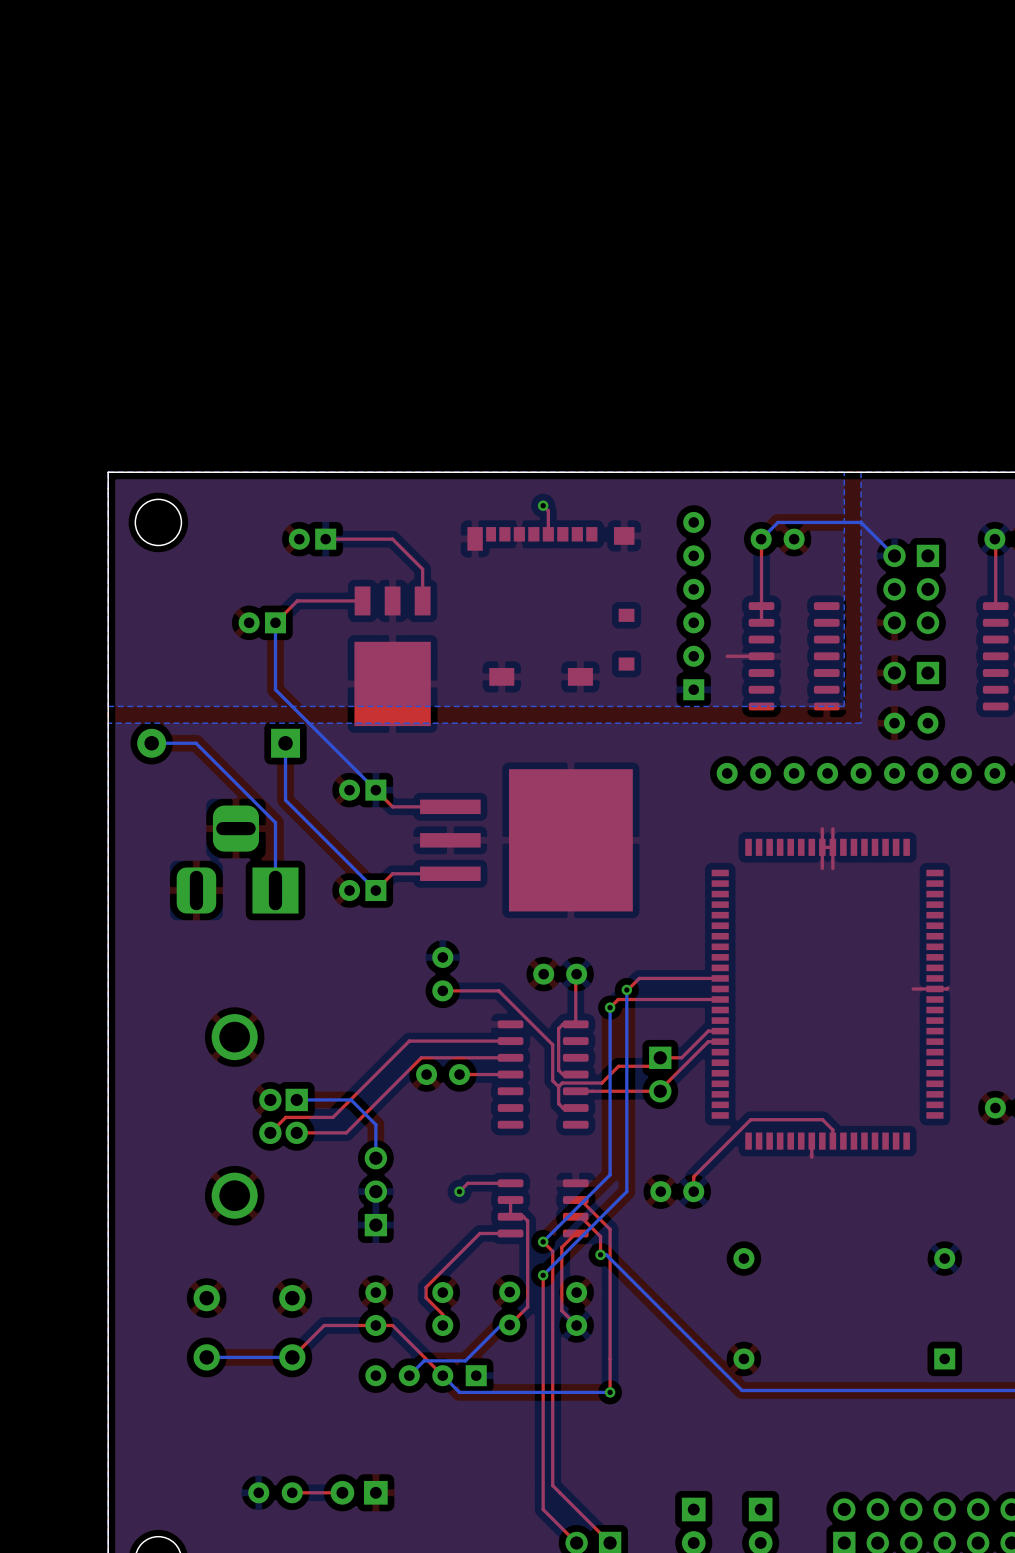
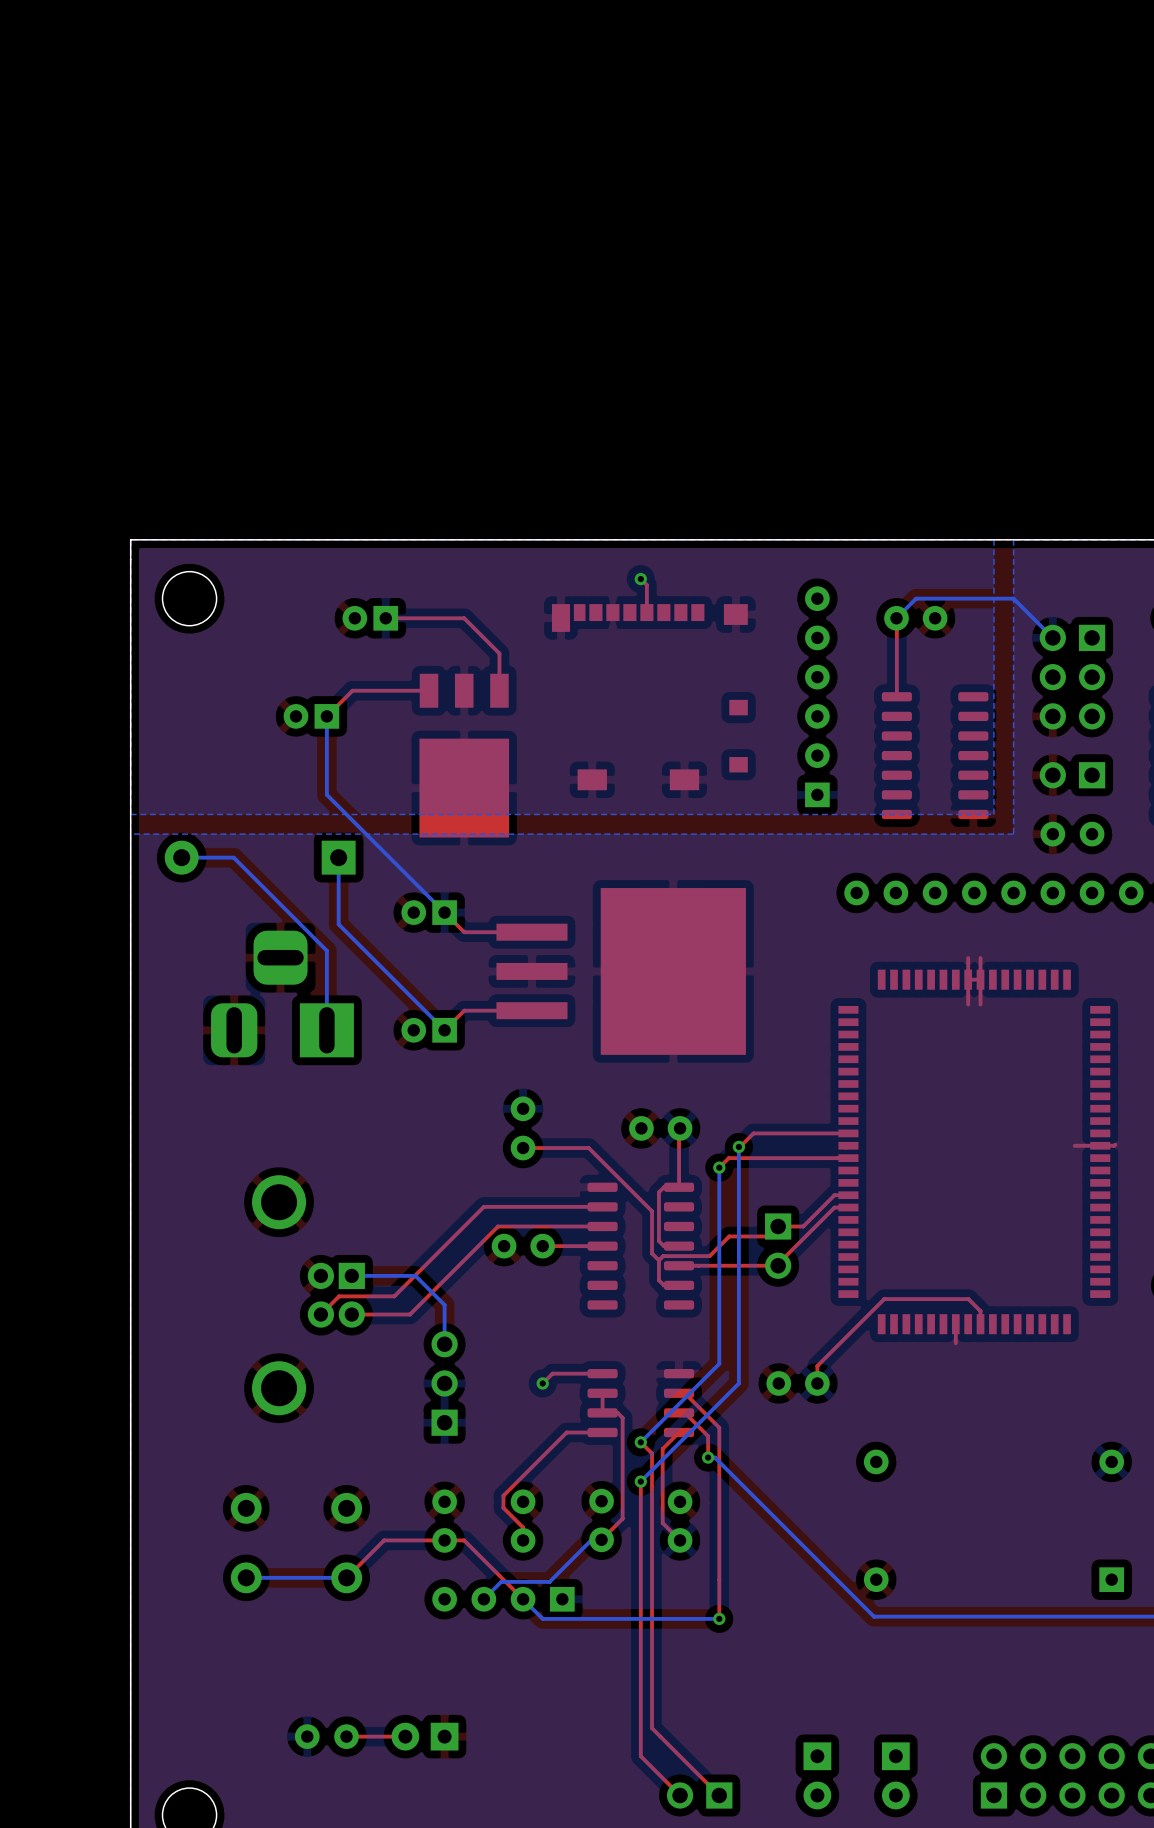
top track: (761, 606) (761, 622) -> none
top track: (761, 656) (727, 656) -> none

